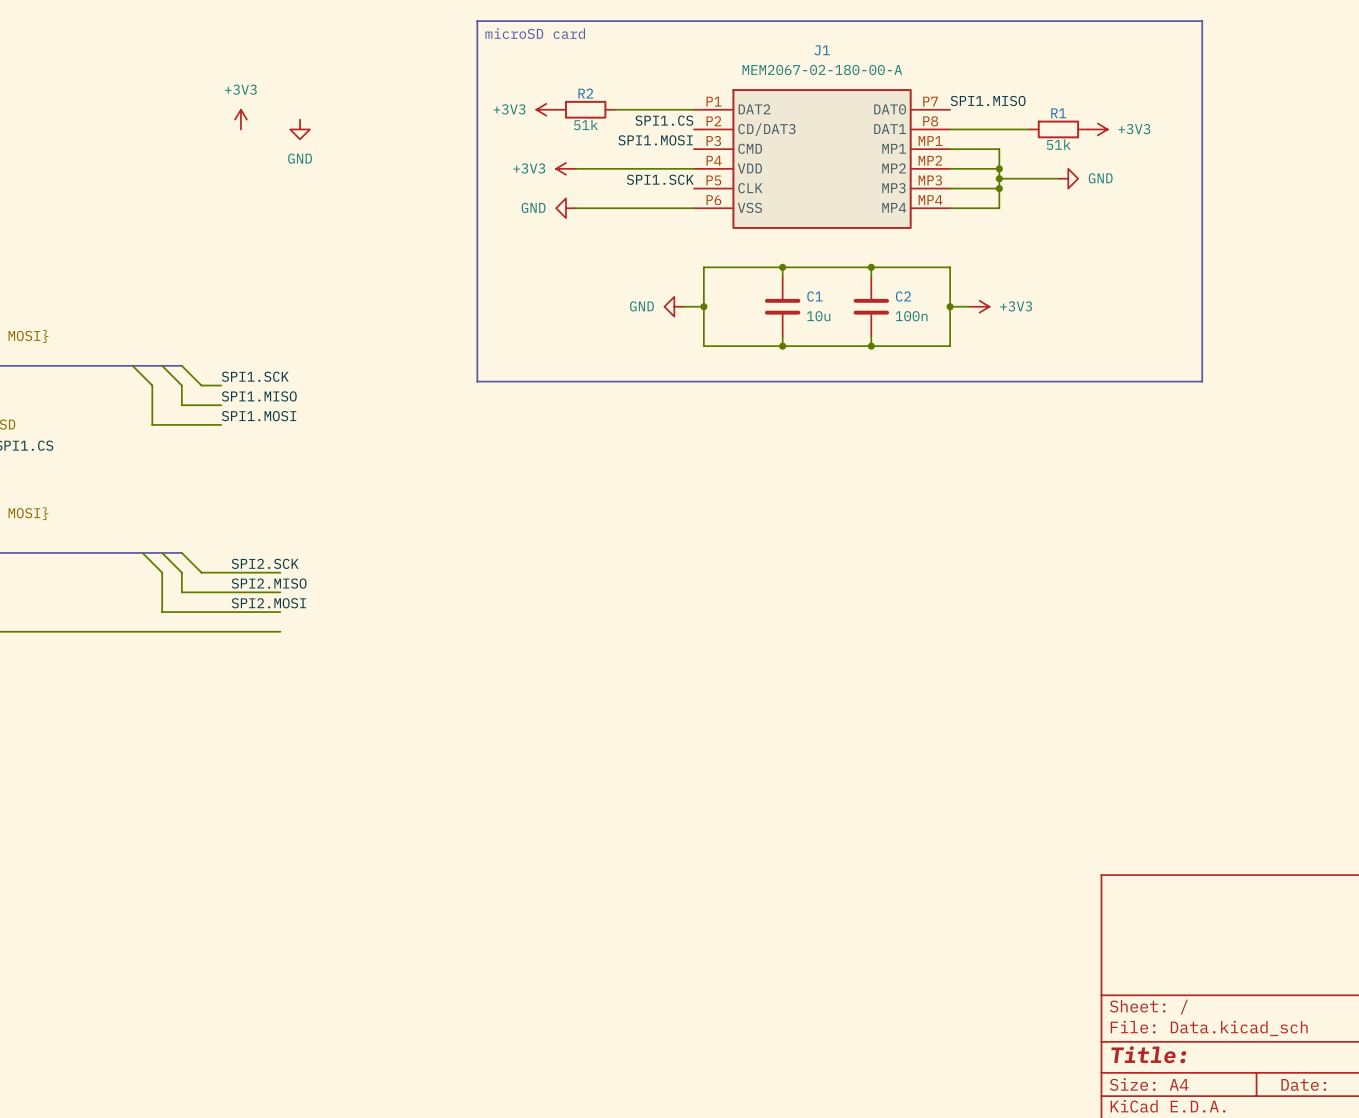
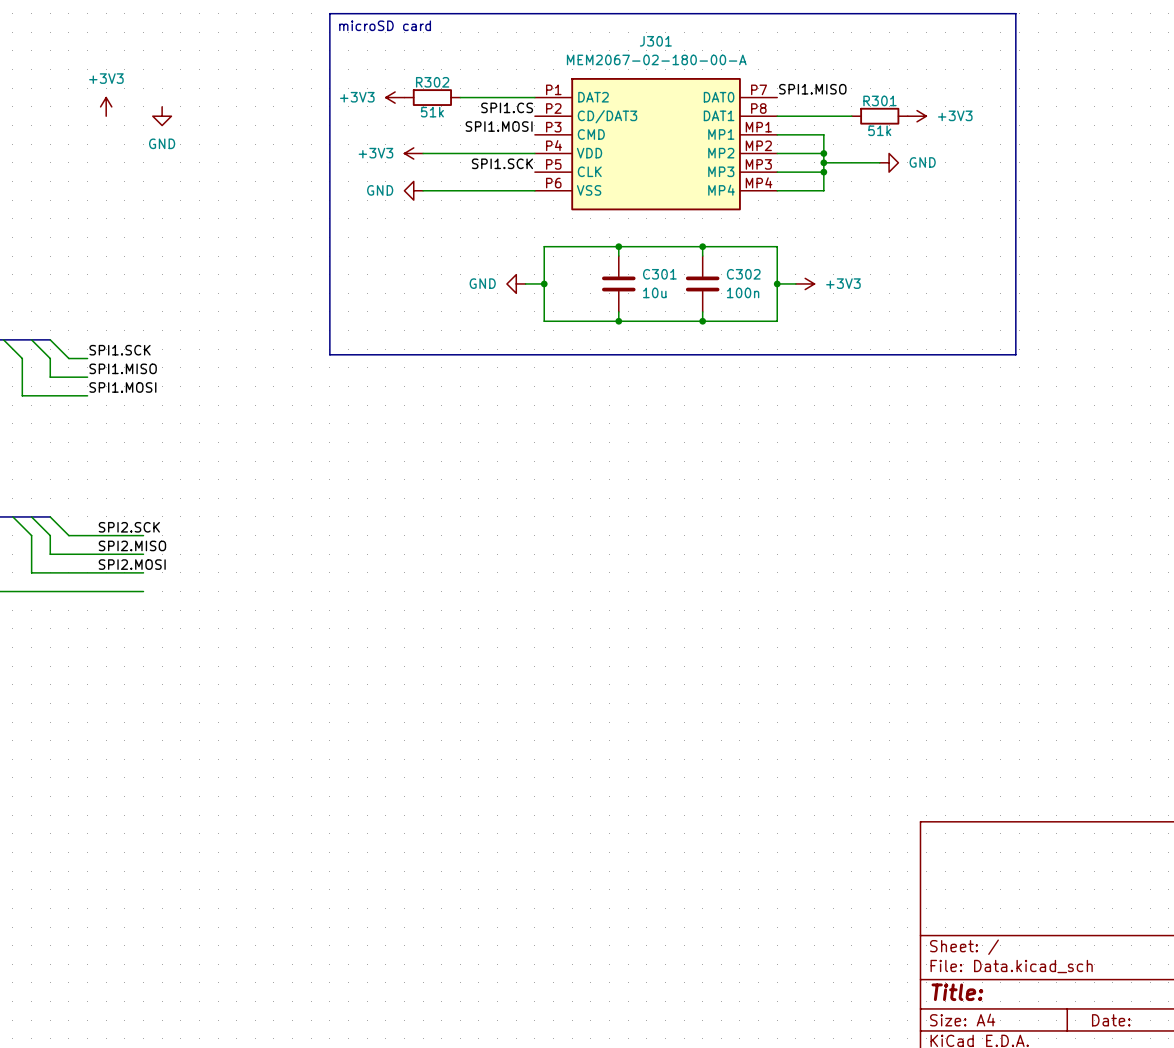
J1 name: J1 (822, 50) -> J301 (655, 41)
R2 name: R2 (585, 93) -> R302 (432, 82)
R1 name: R1 (1058, 113) -> R301 (879, 100)
C1 name: C1 (814, 296) -> C301 (659, 274)
C2 name: C2 (903, 296) -> C302 (743, 274)

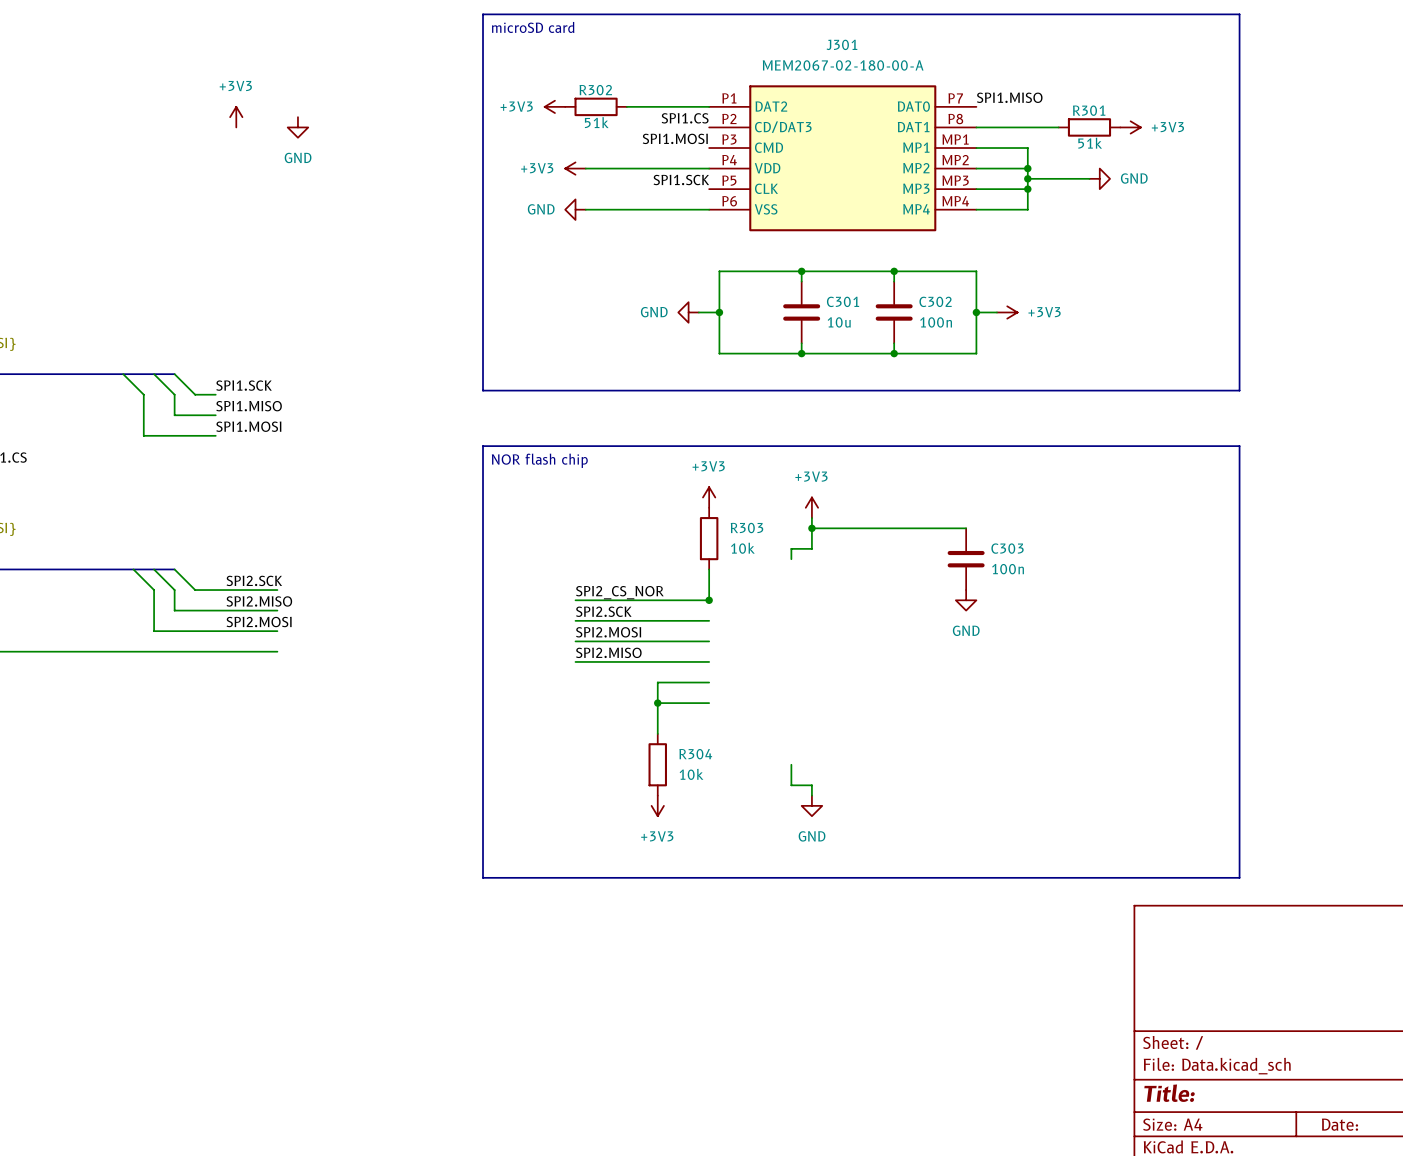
line: none -> (483, 446) (1239, 446) (1239, 877) (483, 877) (483, 446)
text: none -> NOR flash chip (539, 460)
power symbol: none -> +3V3 (709, 497)
power symbol: none -> +3V3 (811, 507)
wire: none -> (811, 518) (811, 548) (791, 548) (791, 559)
wire: none -> (811, 528) (966, 528)
junction: none -> (811, 528)
R303: none -> 10k (709, 538)
C303: none -> 100n (966, 559)
wire: none -> (709, 569) (709, 600) (575, 600)
label: none -> SPI2_CS_NOR (619, 592)
junction: none -> (709, 600)
power symbol: none -> GND (966, 600)
label: none -> SPI2.SCK (603, 611)
wire: none -> (575, 620) (709, 620)
label: none -> SPI2.MOSI (608, 632)
wire: none -> (575, 641) (709, 641)
label: none -> SPI2.MISO (608, 652)
wire: none -> (575, 661) (709, 661)
wire: none -> (709, 682) (657, 682) (657, 733)
wire: none -> (657, 703) (709, 703)
junction: none -> (657, 703)
R304: none -> 10k (657, 764)
wire: none -> (791, 764) (791, 785) (811, 785) (811, 795)
power symbol: none -> +3V3 (657, 805)
power symbol: none -> GND (811, 805)

